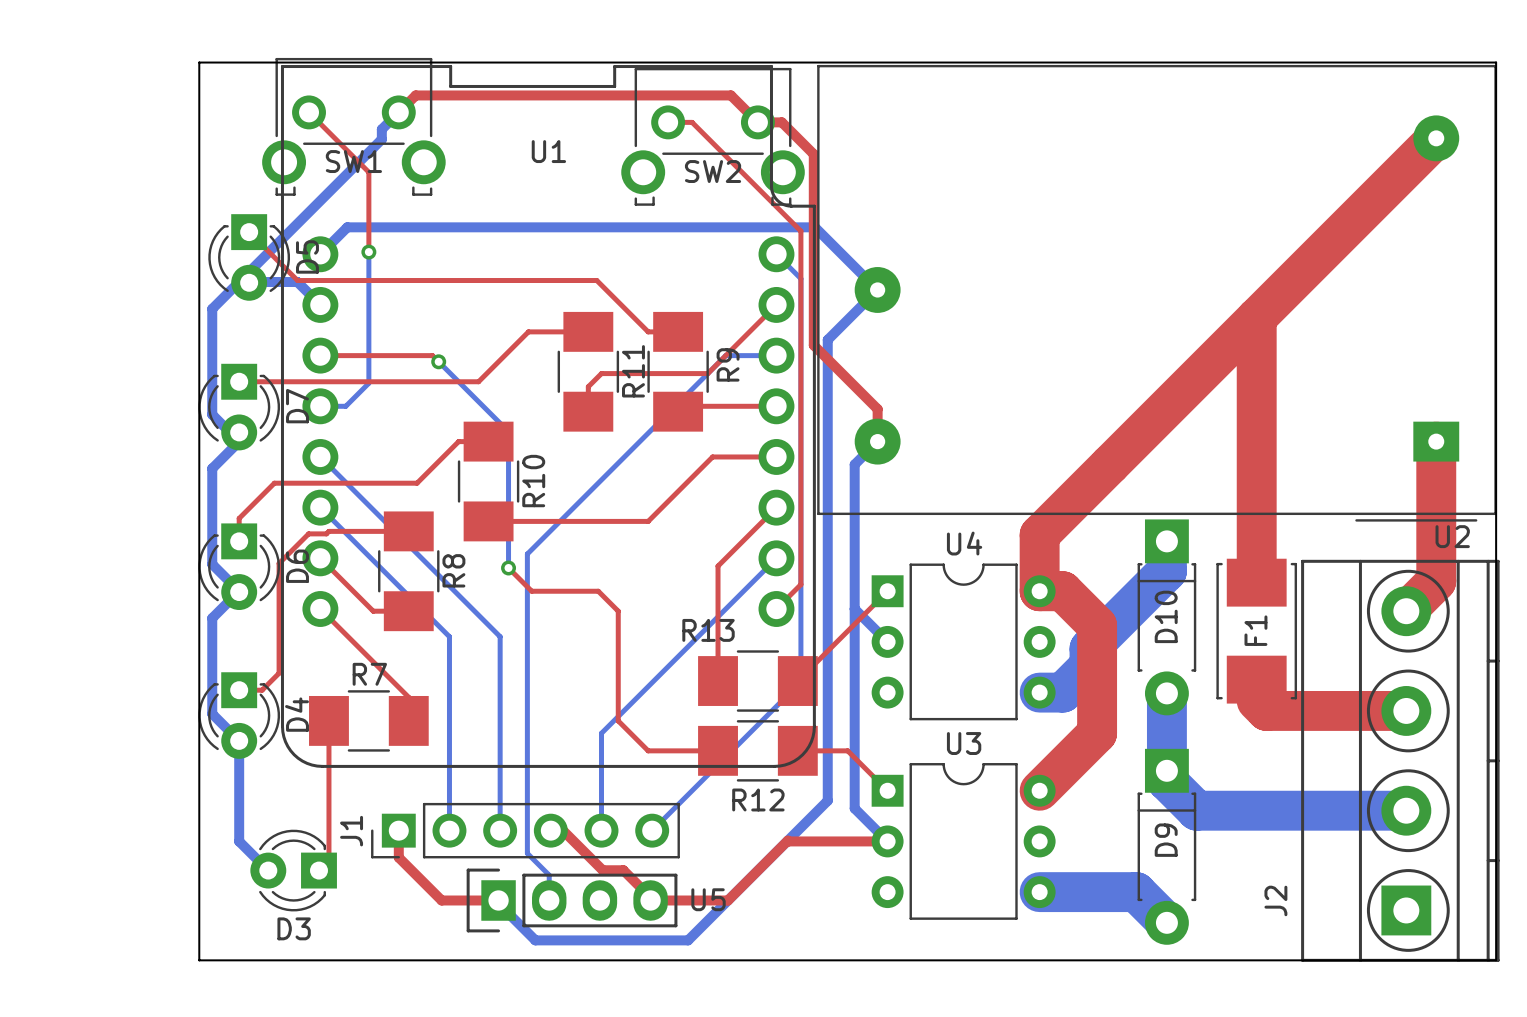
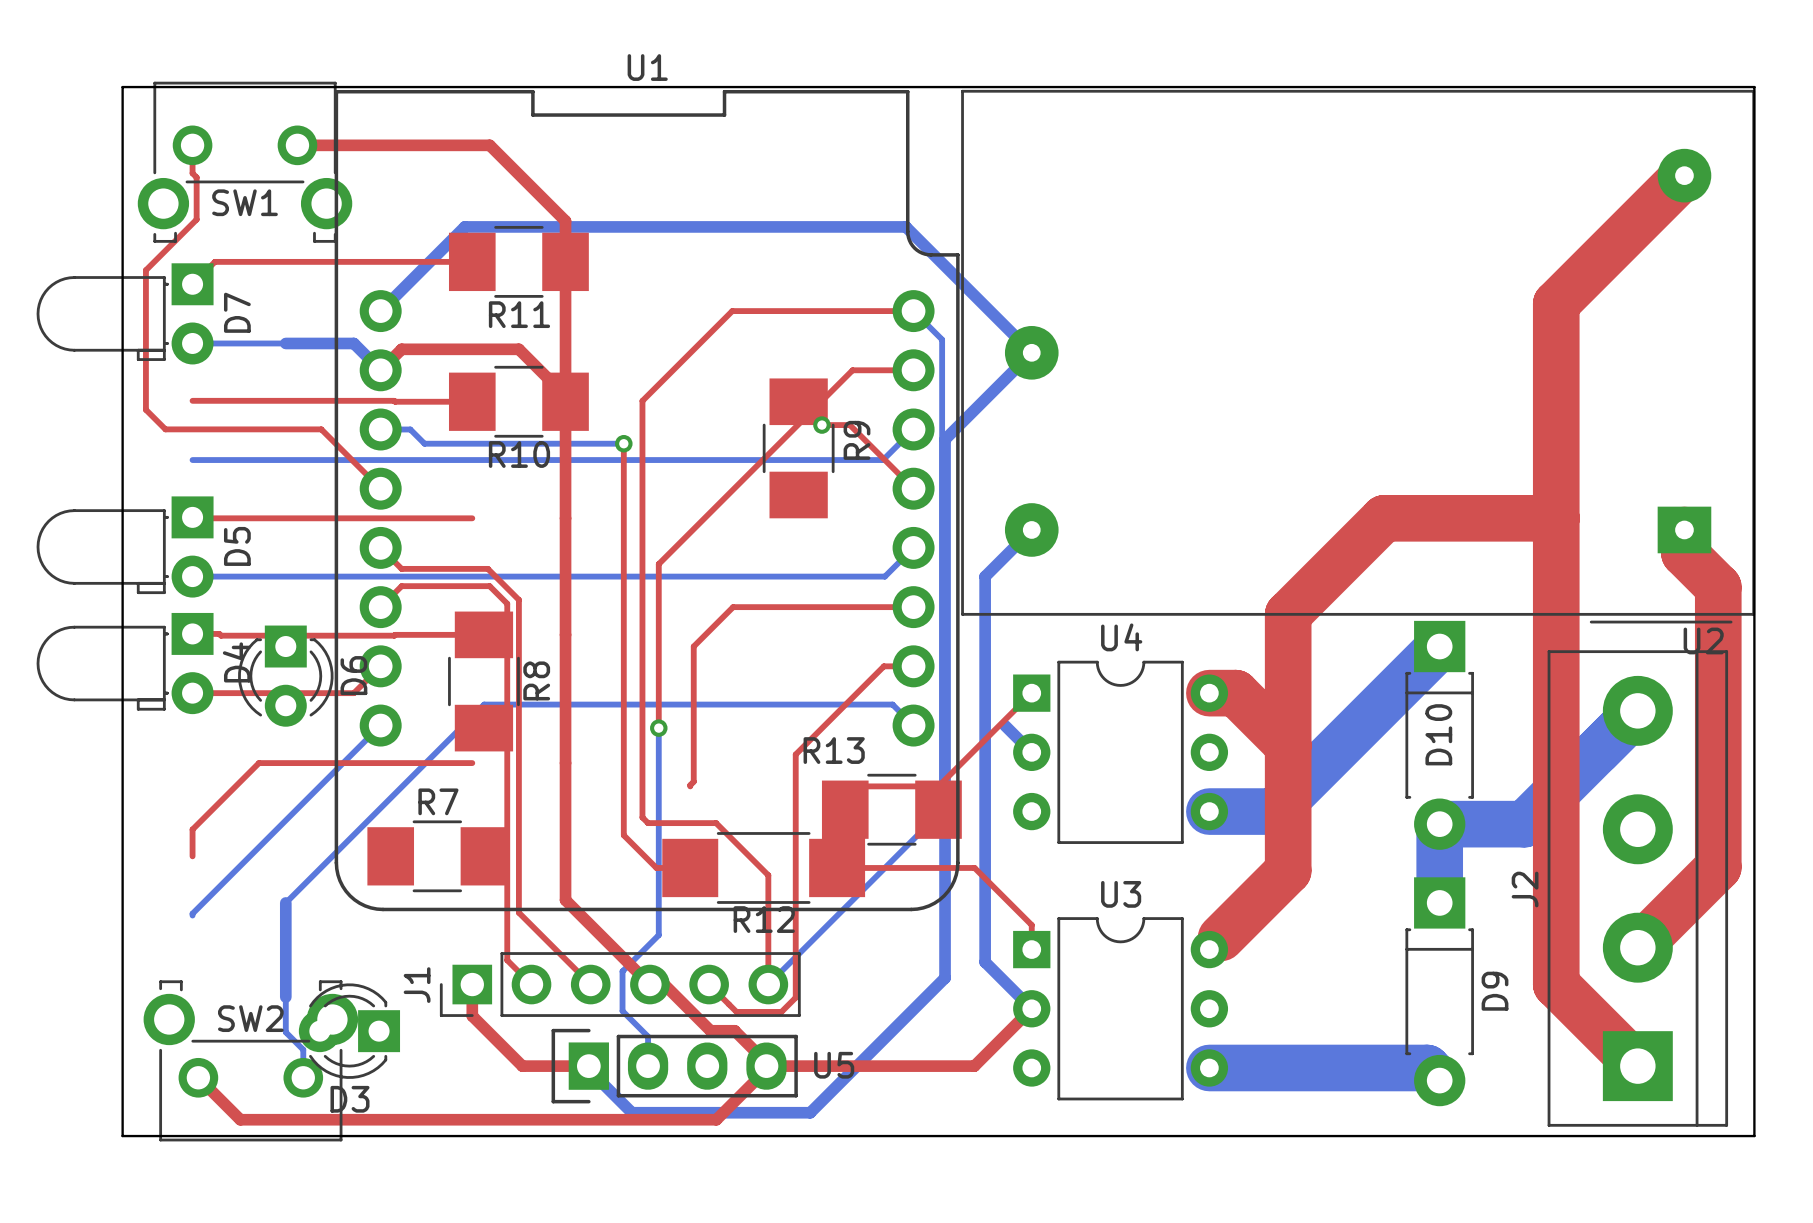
board edge: (199, 62) (199, 960) -> (239, 87) (122, 87) (122, 1136) (239, 1136)
top track: none -> (192, 145) (192, 173) (196, 177) (196, 219) (145, 270) (145, 409) (165, 429) (321, 429) (380, 488)
top track: none -> (297, 145) (489, 145) (565, 221) (565, 900) (649, 984)
top track: (309, 112) (368, 172) (368, 252) -> none
top track: (398, 112) (415, 95) (730, 95) (757, 122) (781, 122) (813, 154) (813, 345) (877, 409) (877, 441) -> none
bottom track: (398, 112) (381, 129) (381, 139) (212, 308) (212, 414) (239, 441) (212, 468) (212, 564) (239, 591) (212, 618) (212, 713) (239, 740) (239, 760) -> none
top track: (668, 122) (692, 122) (800, 231) (800, 584) (776, 609) -> none
SW1 position: (353, 126) -> (245, 162)
SW2 rotation: 0° (713, 136) -> 180° (250, 1060)
SW2 position: (713, 136) -> (250, 1060)
U1 name position: U1 (548, 151) -> U1 (647, 67)
top track: none -> (472, 261) (214, 261) (192, 284)
D5 footprint: [208, 214, 291, 301] -> [36, 496, 214, 598]
bottom track: (347, 227) (814, 227) -> (412, 279) (464, 226) (905, 226) (958, 279)
top track: (249, 232) (297, 280) (596, 280) (648, 331) (678, 331) -> none
top track: (1326, 248) (1039, 534) (1039, 591) (1062, 591) (1097, 625) -> (1556, 518) (1384, 518) (1288, 614) (1288, 744)
top track: none -> (1556, 303) (1556, 984) (1637, 1066)
bottom track: (368, 252) (368, 383) (345, 406) (320, 406) -> none
via: (368, 252) -> none
top track: none -> (913, 311) (732, 311) (642, 400) (642, 817) (648, 823) (716, 823) (768, 875) (768, 984)
bottom track: none -> (192, 343) (285, 343)
top track: none -> (380, 370) (401, 349) (518, 349) (565, 395)
top track: (776, 304) (707, 373) (601, 373) (588, 386) (588, 411) -> (913, 370) (852, 370) (658, 564) (658, 728)
top track: (1256, 317) (1256, 585) -> none
top track: none -> (192, 400) (472, 401)
top track: (588, 331) (528, 331) (478, 381) (239, 381) -> none
bottom track: (827, 339) (827, 800) (803, 825) -> (973, 411) (945, 439) (945, 978)
via: none -> (821, 425)
top track: (320, 355) (432, 355) (438, 361) -> none
bottom track: none -> (380, 429) (410, 429) (424, 443) (623, 443)
bottom track: (776, 355) (725, 355) (527, 554) (527, 819) -> (658, 728) (658, 935) (622, 971)
bottom track: none -> (913, 429) (883, 460) (192, 460)
bottom track: (438, 361) (508, 431) (508, 568) -> none
via position: (438, 361) -> (623, 443)
D7 footprint: [198, 363, 281, 451] -> [36, 263, 214, 365]
top track: none -> (623, 443) (623, 835) (656, 867) (690, 867)
R11 rotation: 0° (588, 371) -> 90° clockwise (518, 261)
R11 position: (588, 371) -> (518, 261)
top track: (776, 406) (683, 406) (678, 411) -> (913, 488) (849, 425) (821, 425)
top track: none -> (192, 517) (472, 518)
top track: (488, 441) (458, 441) (417, 483) (274, 483) (239, 518) (239, 541) -> none
top track: none -> (380, 547) (401, 568) (487, 568) (518, 599) (518, 912) (590, 984)
bottom track: (320, 456) (500, 636) (500, 830) -> none
top track: (776, 456) (712, 456) (648, 521) (488, 521) -> none
bottom track: none -> (913, 547) (884, 576) (192, 576)
top track: (1436, 461) (1436, 581) (1406, 611) -> (1684, 553) (1718, 587) (1718, 867) (1637, 947)
bottom track: (854, 464) (854, 808) (887, 841) -> (1004, 556) (985, 576) (985, 962) (1031, 1008)
R10 rotation: 0° (488, 481) -> 90° clockwise (518, 401)
R10 position: (488, 481) -> (518, 401)
top track: none -> (380, 607) (401, 586) (489, 586) (507, 603) (507, 960) (531, 984)
bottom track: (320, 507) (449, 636) (449, 830) -> none
top track: (776, 507) (718, 566) (718, 676) -> (913, 607) (733, 607) (693, 646) (693, 781) (690, 786)
top track: (332, 531) (326, 533) (308, 533) (279, 563) (279, 673) (262, 690) (239, 690) -> (395, 634) (221, 635) (219, 633) (192, 633)
bottom track: (1166, 541) (1166, 571) (1089, 648) (1089, 665) (1062, 692) (1039, 692) -> none
bottom track: none -> (1439, 646) (1274, 811) (1209, 811)
top track: (320, 558) (373, 611) (408, 611) -> (380, 666) (353, 693) (192, 693)
top track: none -> (913, 666) (883, 666) (795, 754) (795, 997) (781, 1011) (736, 1011) (709, 984)
bottom track: (776, 558) (601, 733) (601, 830) -> none
J2 footprint: [1301, 559, 1500, 962] -> [1547, 650, 1729, 1127]
top track: (508, 568) (531, 591) (598, 591) (618, 611) (618, 720) (648, 750) (718, 750) -> none
via position: (508, 568) -> (658, 728)
top track: none -> (1031, 693) (938, 786) (837, 786)
top track: none -> (1209, 693) (1235, 693) (1288, 745)
top track: (887, 591) (797, 681) -> none
bottom track: none -> (1637, 710) (1524, 824) (1439, 824) (1439, 902)
top track: (320, 609) (408, 697) (408, 720) -> none
bottom track: none -> (380, 725) (192, 915)
bottom track: none -> (913, 725) (892, 704) (484, 704) (283, 905)
D10 position: (1166, 617) -> (1439, 735)
F1: (1256, 631) -> none
top track: none -> (472, 763) (259, 763) (192, 829) (192, 856)
U4 position: (963, 641) -> (1120, 752)
D4 footprint: [198, 672, 281, 759] -> [36, 612, 214, 715]
bottom track: (1166, 693) (1166, 780) (1196, 810) (1406, 810) -> none
top track: (1256, 700) (1266, 710) (1406, 710) -> none
top track: (328, 720) (328, 860) (318, 870) -> none
R12 footprint: [698, 720, 818, 782] -> [662, 832, 866, 904]
top track: none -> (837, 867) (974, 867) (1031, 925) (1031, 949)
top track: (797, 750) (847, 750) (887, 790) -> none
D9 name position: D9 (1166, 840) -> D9 (1495, 991)
bottom track: (239, 841) (268, 870) -> (285, 997) (285, 1032) (303, 1049) (303, 1077)
top track: (887, 841) (787, 840) (727, 900) -> (1031, 1008) (974, 1066) (856, 1066)
U3 position: (963, 841) -> (1120, 1008)
D9 position: (1166, 846) -> (1439, 991)
bottom track: (1039, 892) (1136, 892) (1166, 922) -> none
J2 name position: J2 (1275, 900) -> J2 (1525, 889)
bottom track: none -> (1209, 1067) (1427, 1067) (1439, 1080)
top track: none -> (766, 1069) (716, 1119) (240, 1119) (198, 1077)

